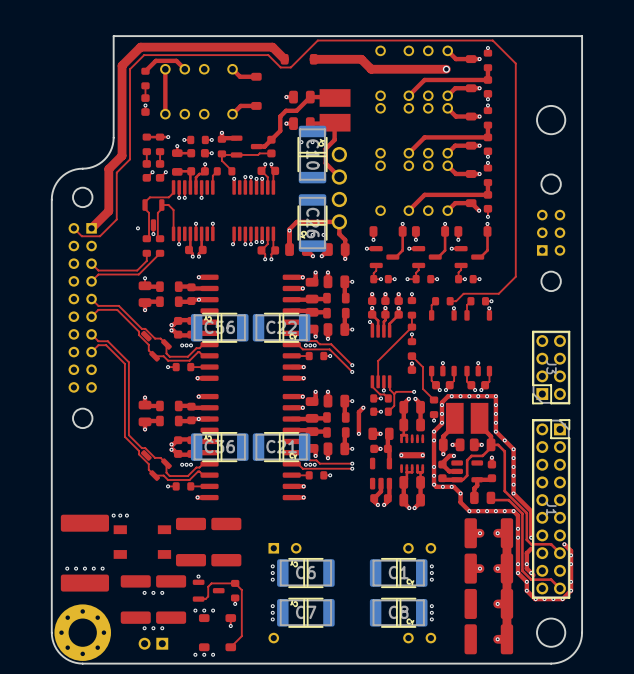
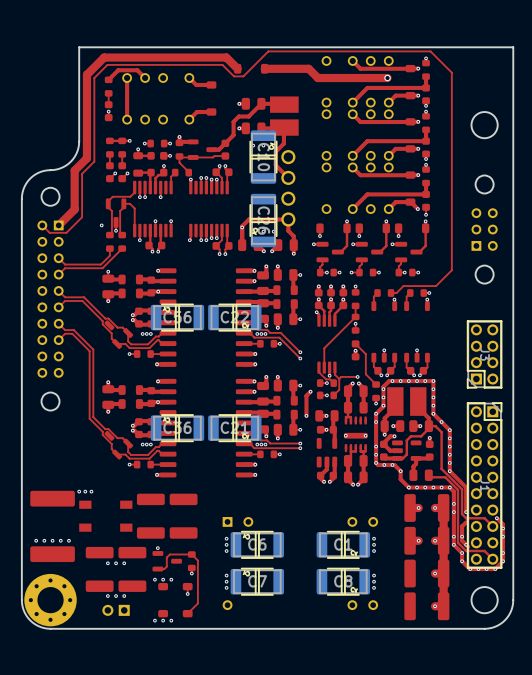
top track: (447, 50) (455, 59) (471, 59) -> (352, 60) (360, 68) (410, 68)
top track: (447, 108) (455, 116) (471, 116) -> (352, 114) (360, 122) (410, 122)
top track: (447, 165) (455, 173) (471, 173) -> (352, 167) (360, 175) (410, 175)

